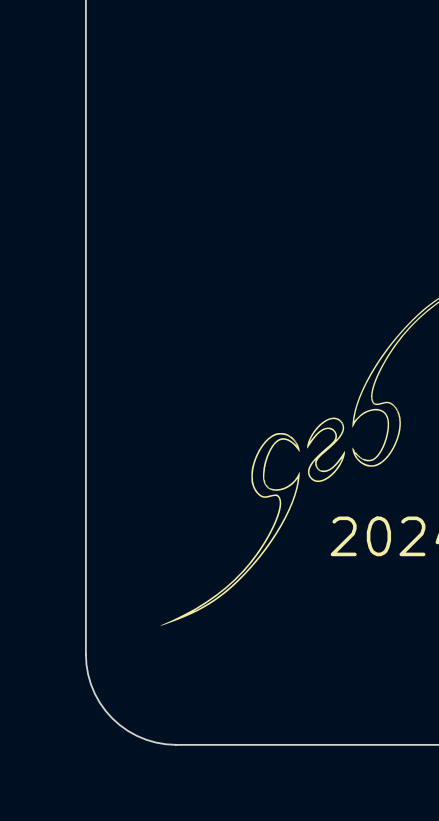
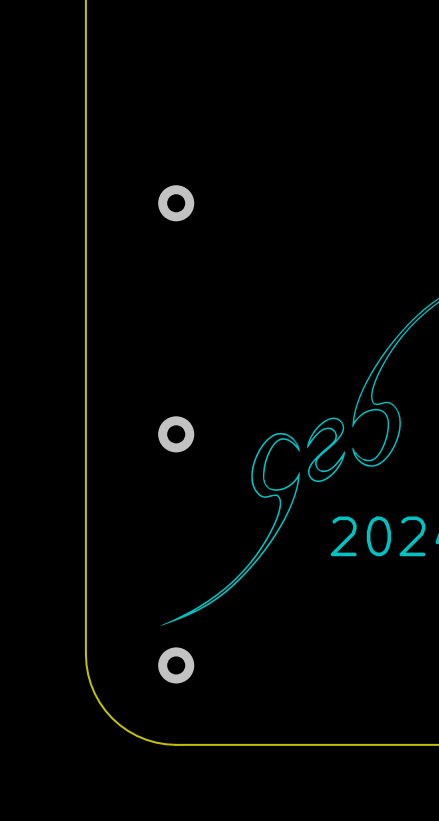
via: none -> (176, 203)
via: none -> (176, 434)
via: none -> (176, 665)

